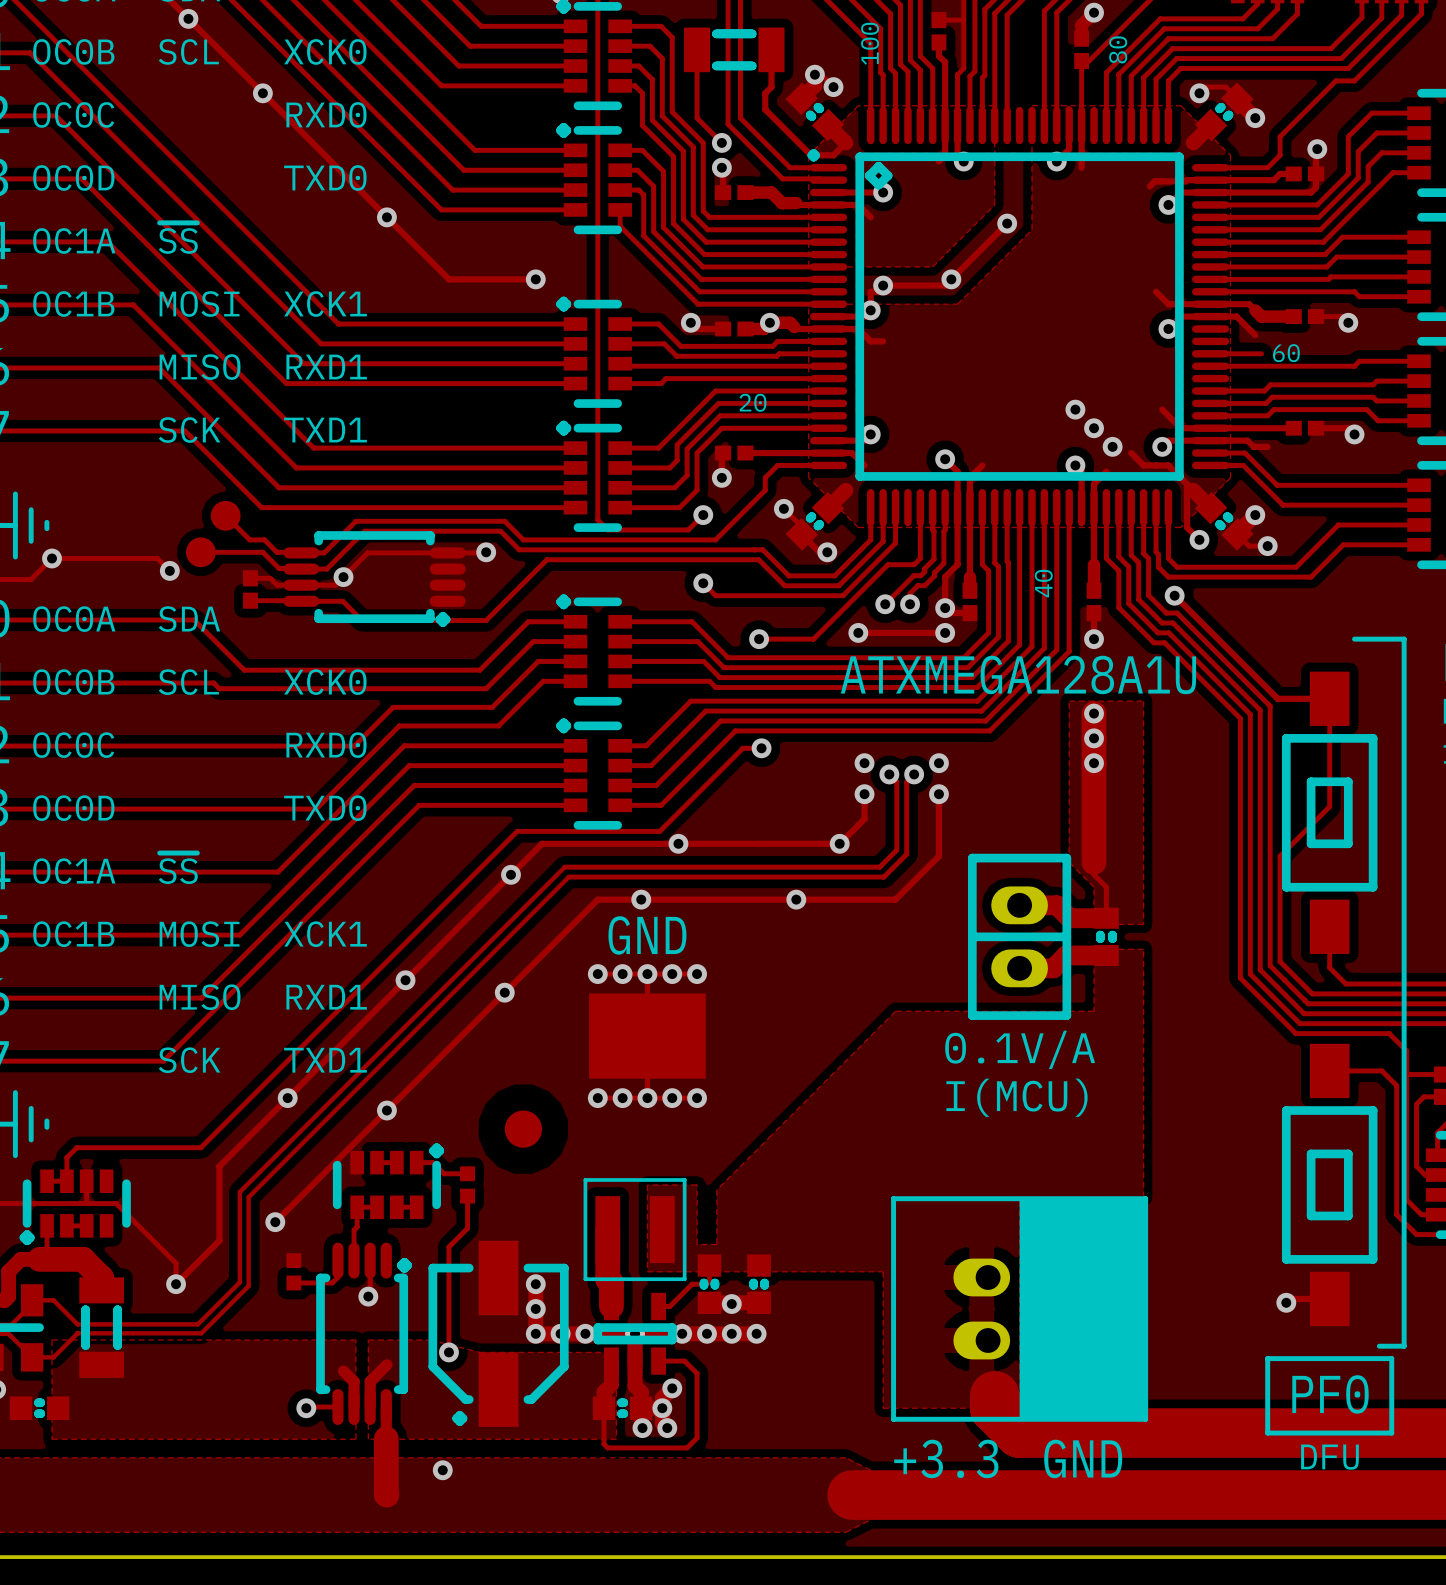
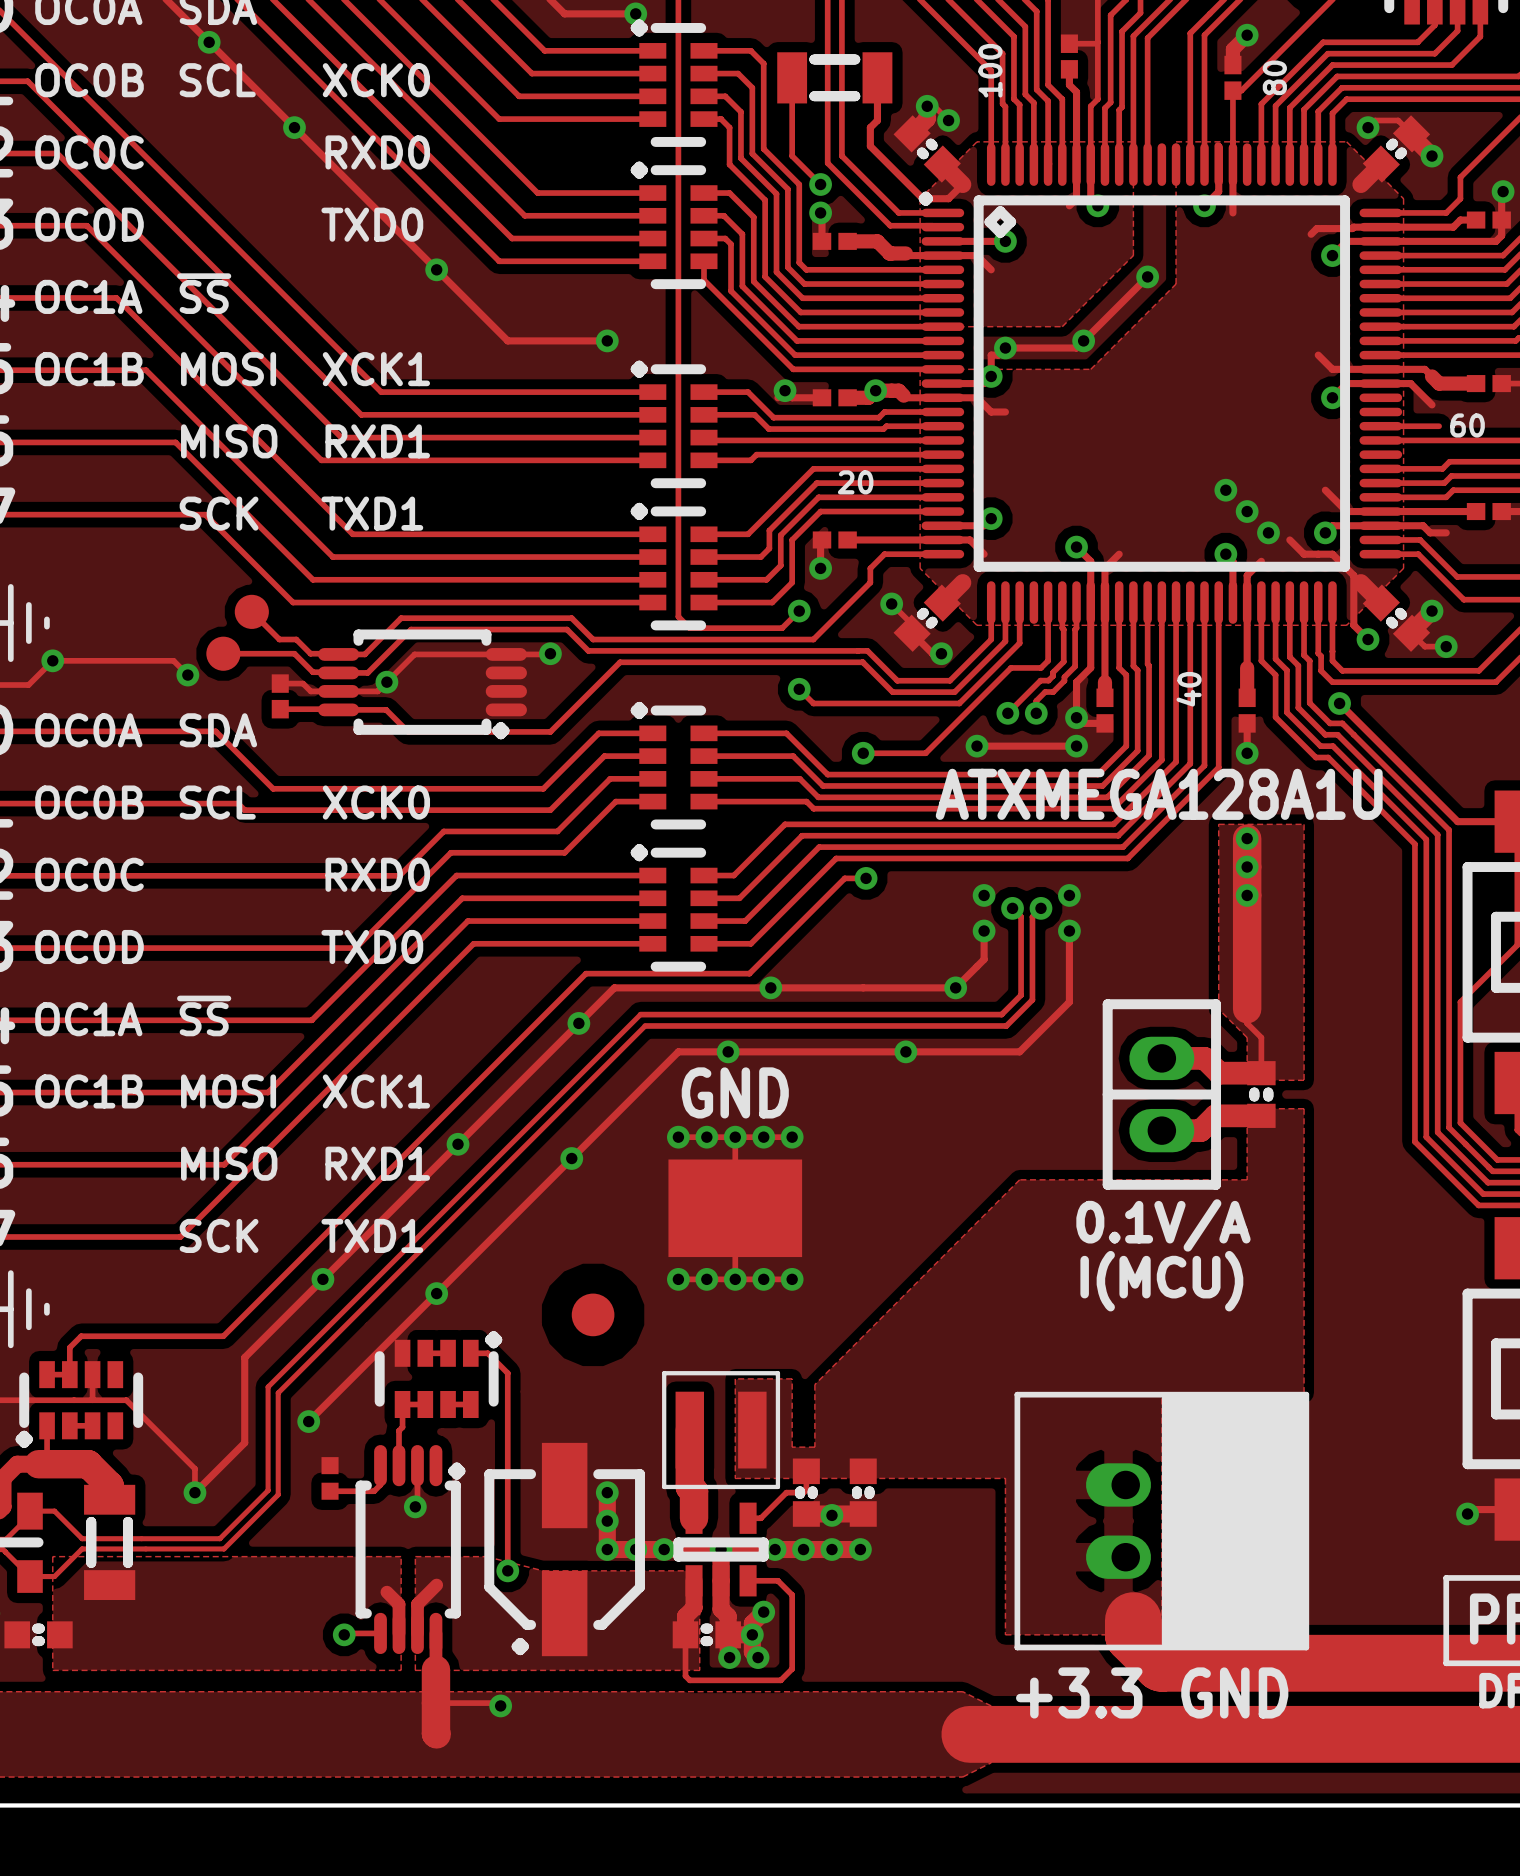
track: (431, 1162) (444, 1173) (467, 1173) -> none
part: (467, 1184) -> none
track: (467, 1196) (467, 1228) (448, 1246) -> (487, 1353) (507, 1373) (507, 1449)
track: none -> (435, 1703) (496, 1703)

